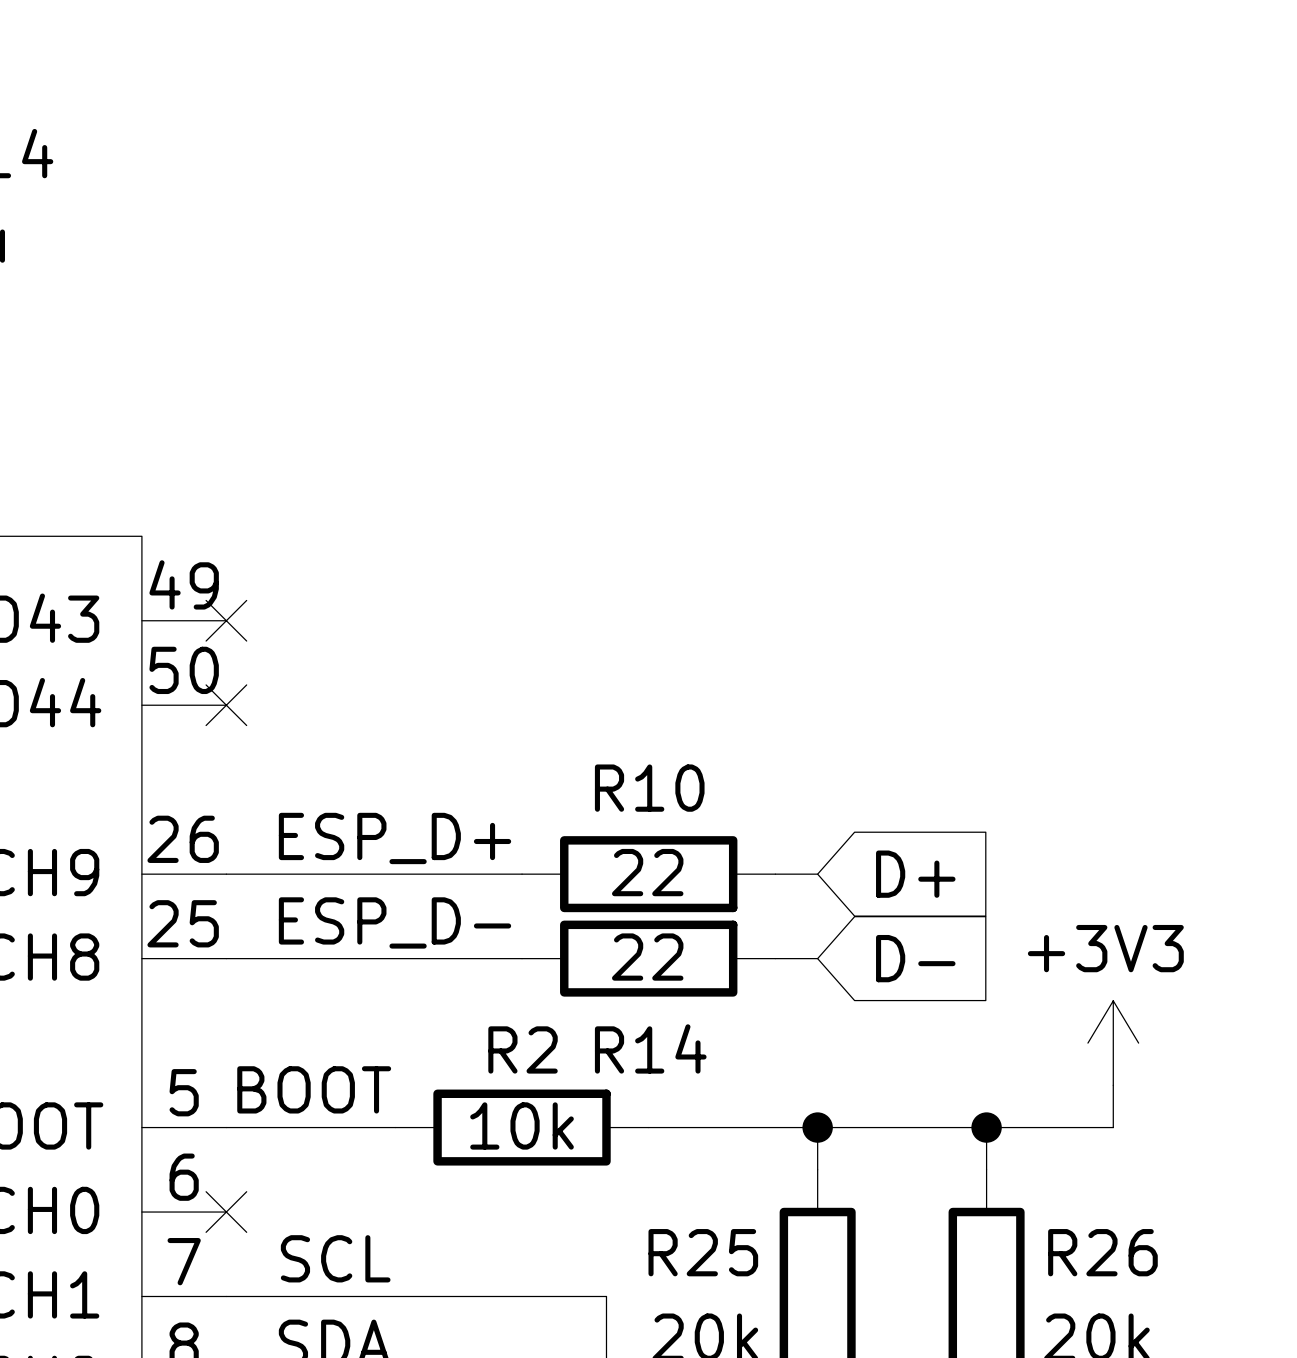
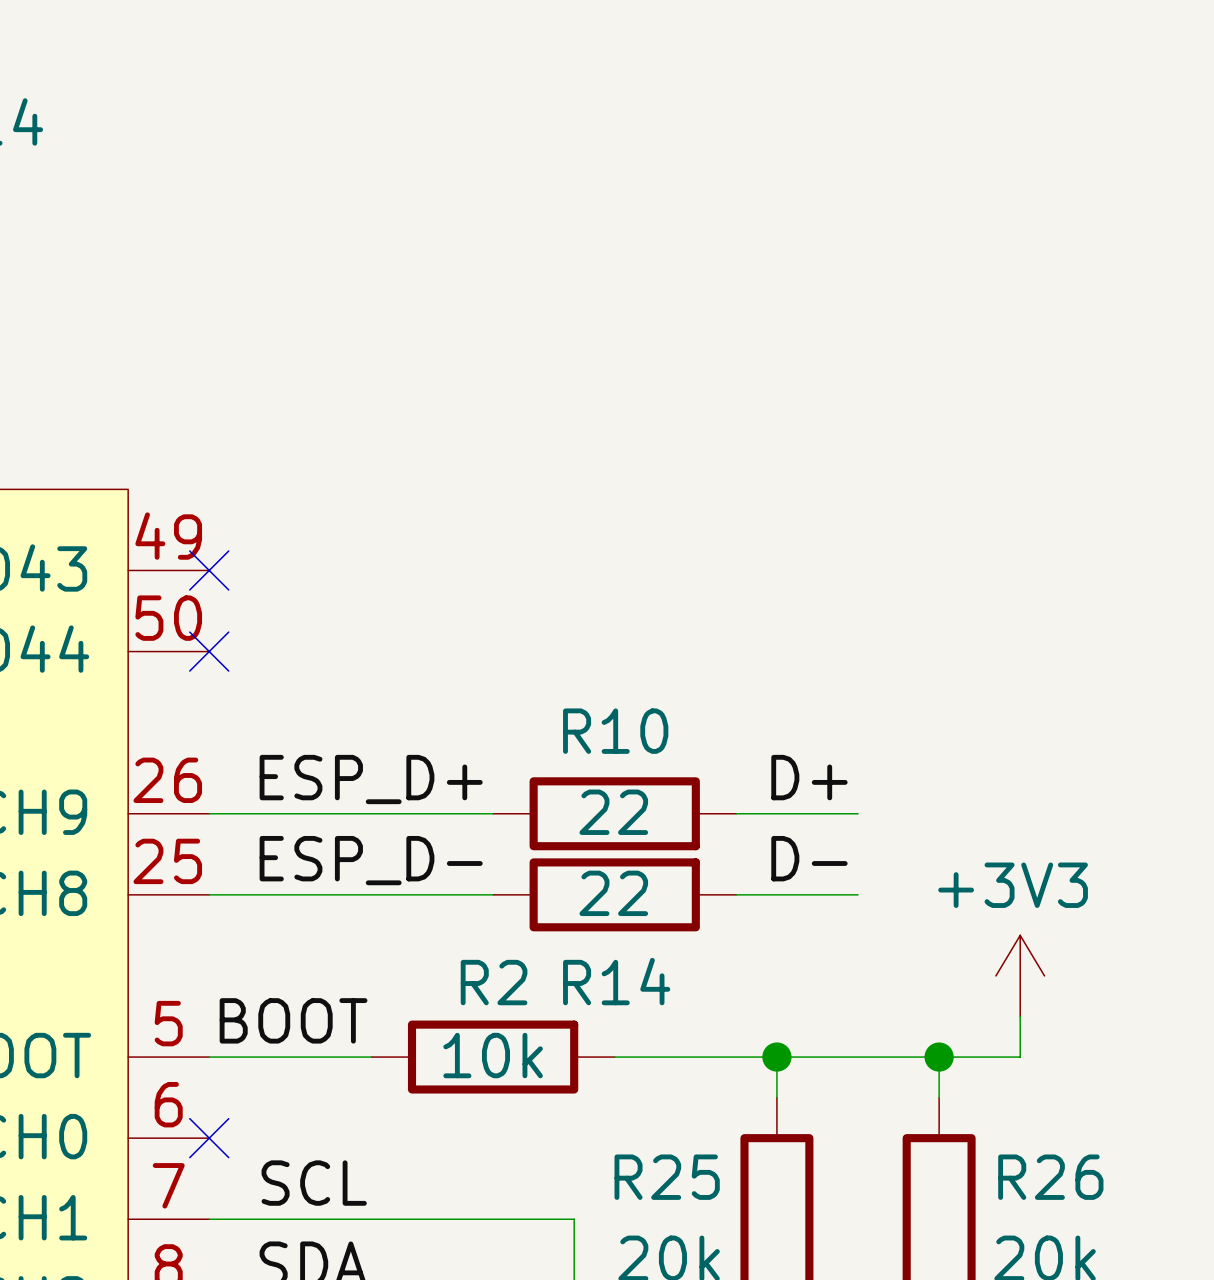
label: none -> D+ (809, 777)
wire: none -> (776, 813) (858, 813)
global label: D+ (915, 874) -> none
label: none -> D- (809, 858)
wire: none -> (776, 894) (858, 894)
global label: D- (915, 958) -> none
power symbol position: +3V3 (1113, 1043) -> +3V3 (1020, 975)
wire: (1113, 1085) (1113, 1127) (1071, 1127) -> (1020, 1016) (1020, 1057)

